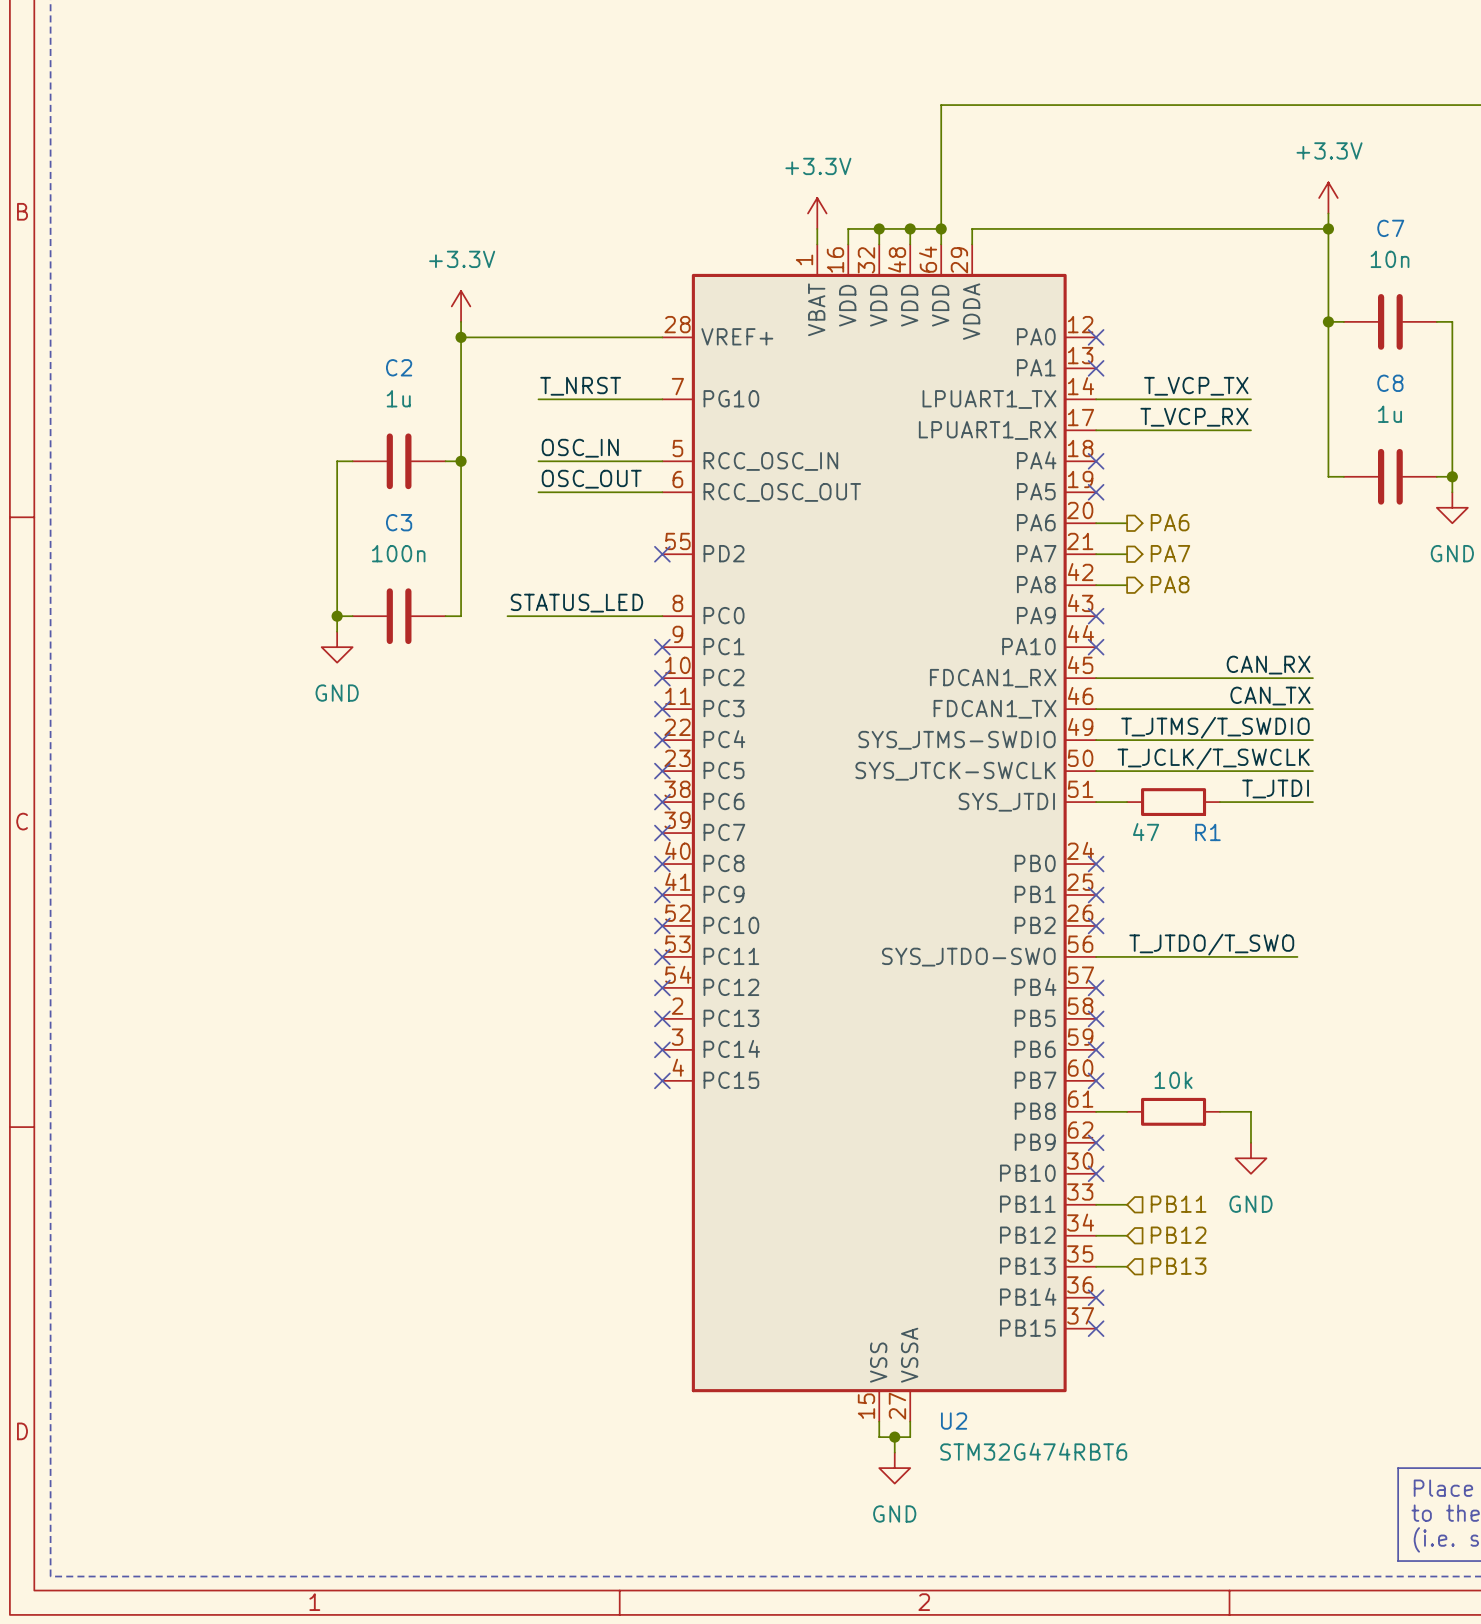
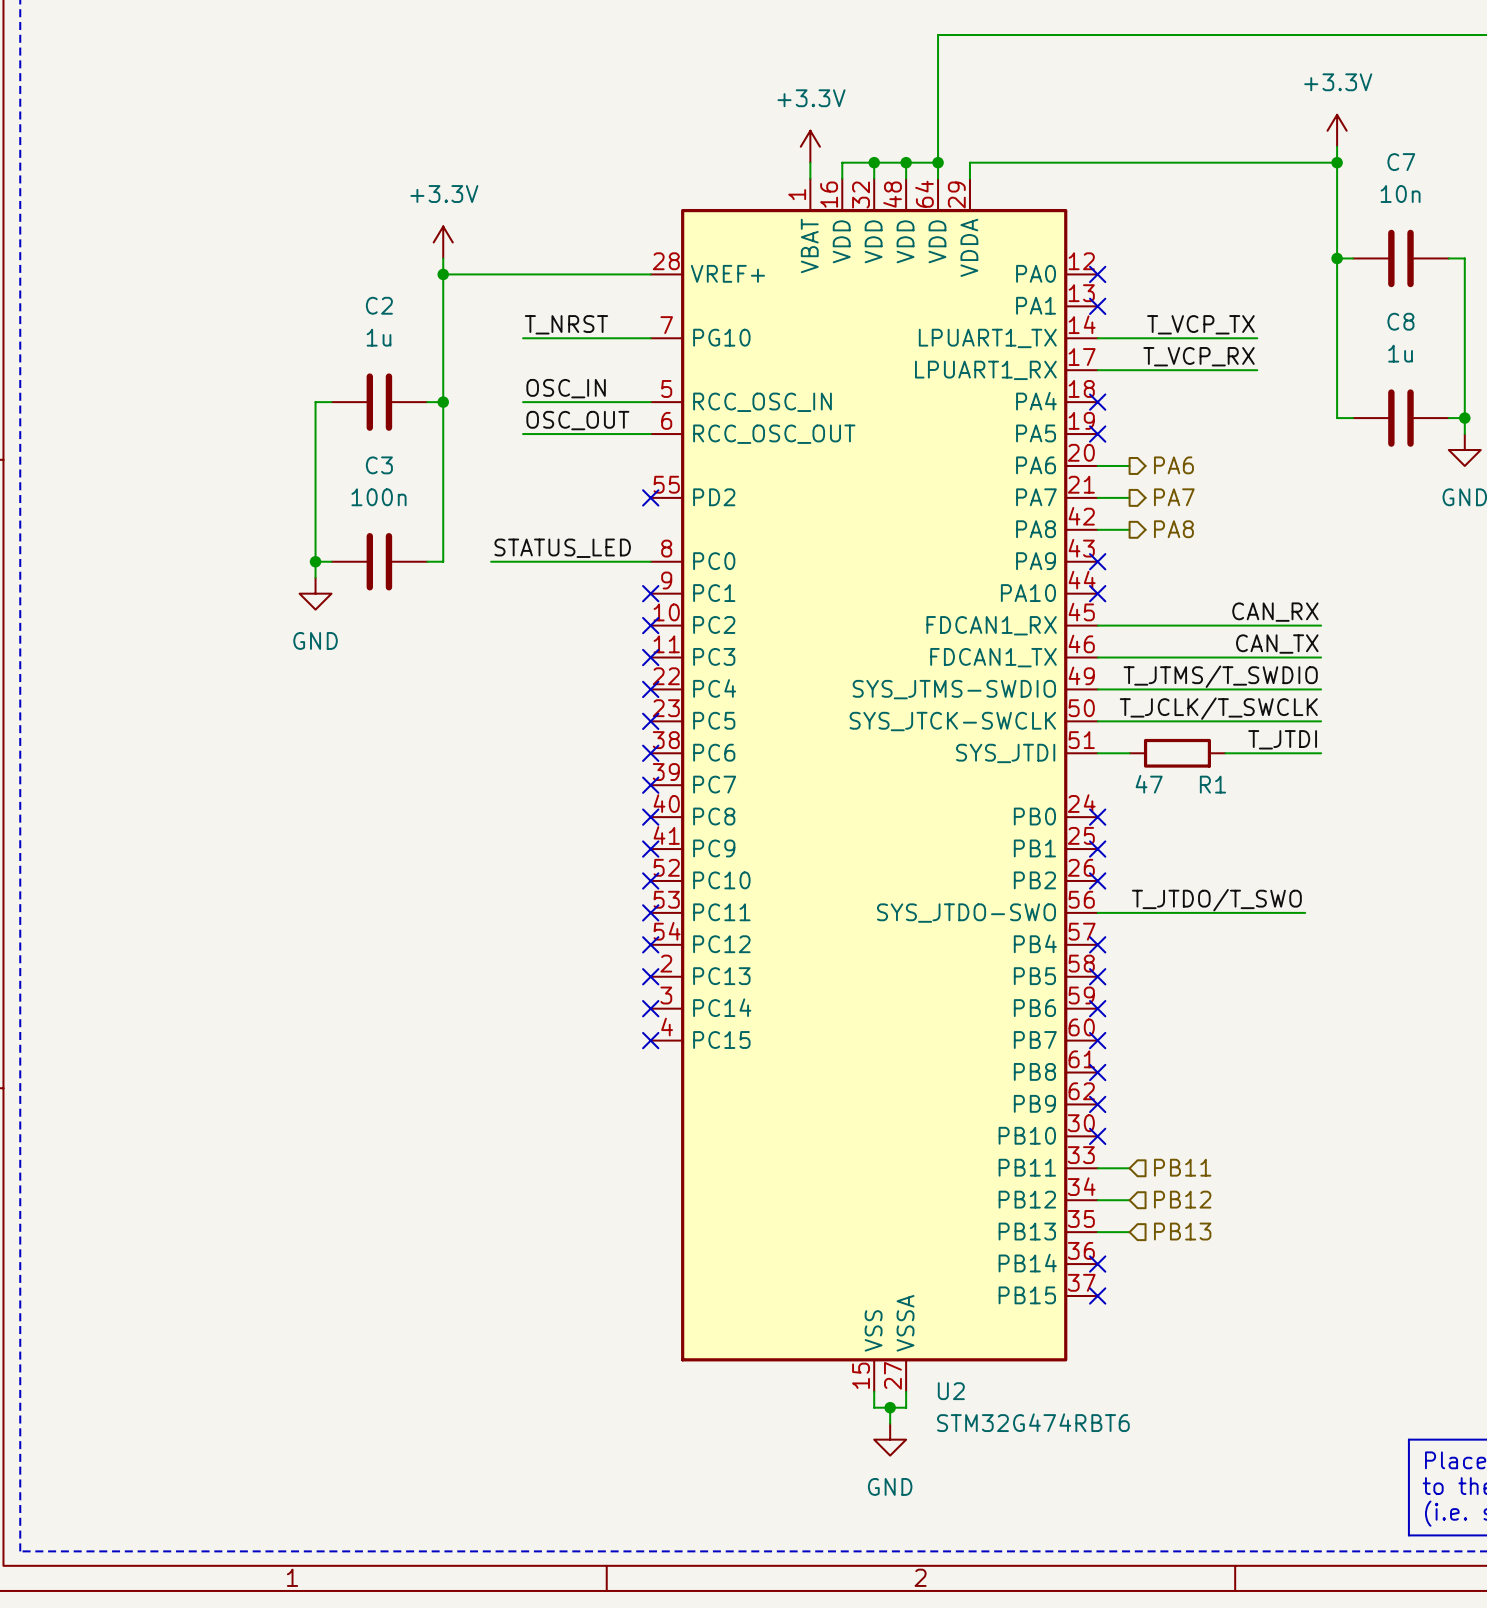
wire: (1096, 1111) (1127, 1111) -> none
no-connect mark: none -> (1097, 1072)
part: 10k (1173, 1111) -> none
wire: (1220, 1111) (1250, 1111) (1250, 1142) -> none
power symbol: GND (1250, 1158) -> none

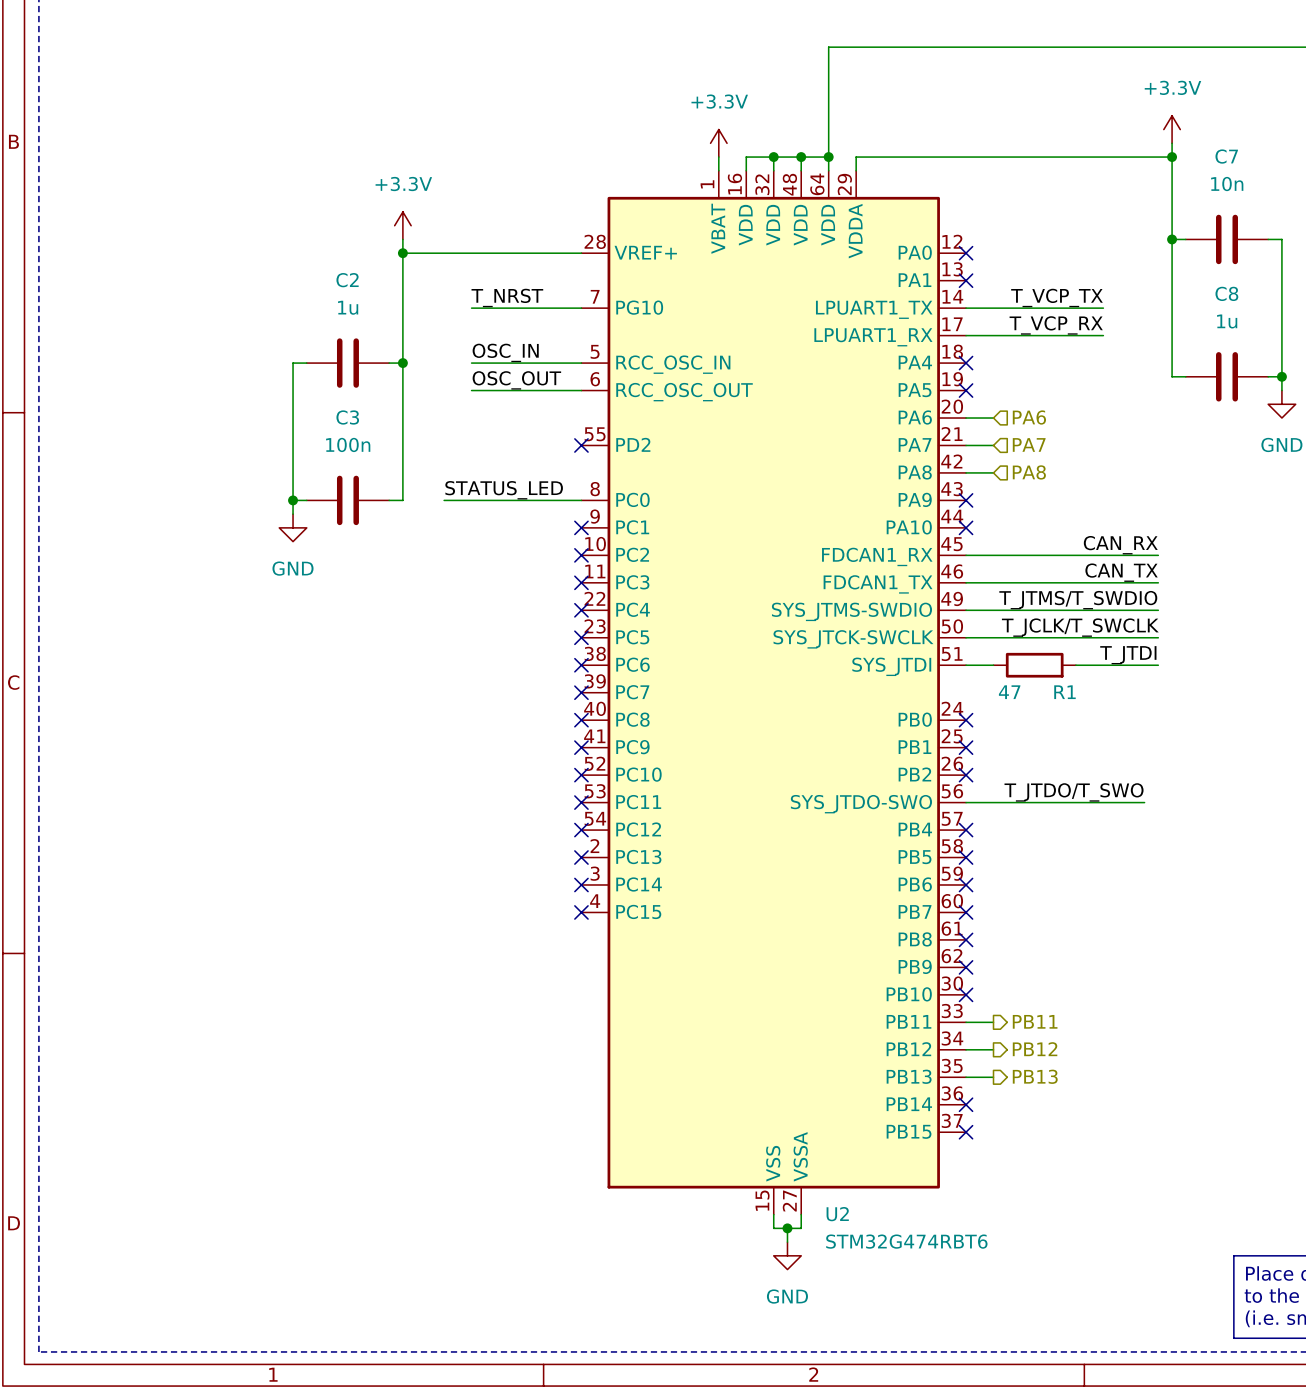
hierarchical label shape: output (1173, 465) -> input (1029, 417)
hierarchical label shape: output (1174, 497) -> input (1029, 444)
hierarchical label shape: output (1173, 529) -> input (1029, 472)
hierarchical label shape: input (1182, 1167) -> output (1035, 1021)
hierarchical label shape: input (1182, 1199) -> output (1035, 1049)
hierarchical label shape: input (1182, 1231) -> output (1035, 1076)

